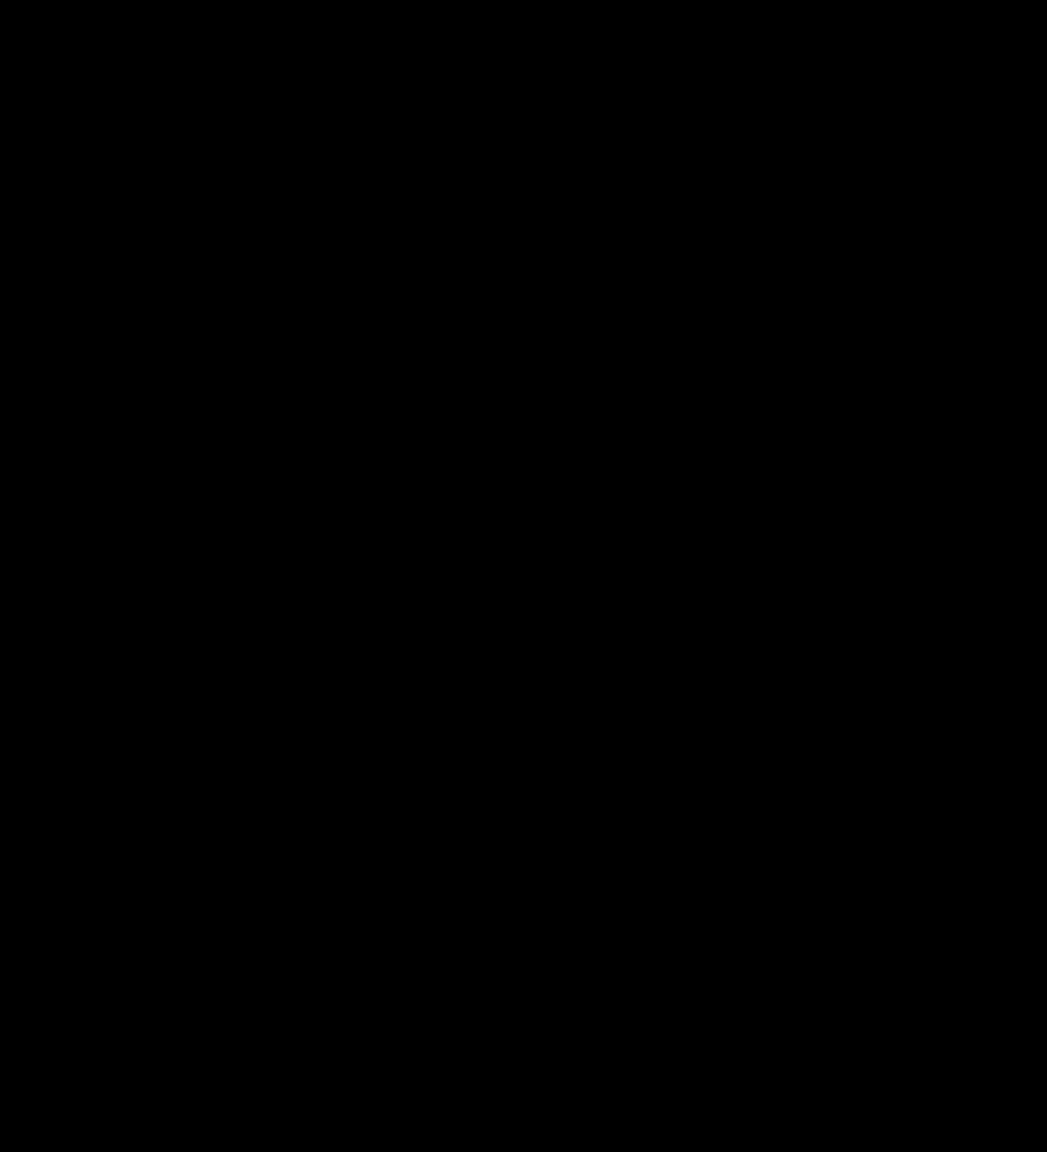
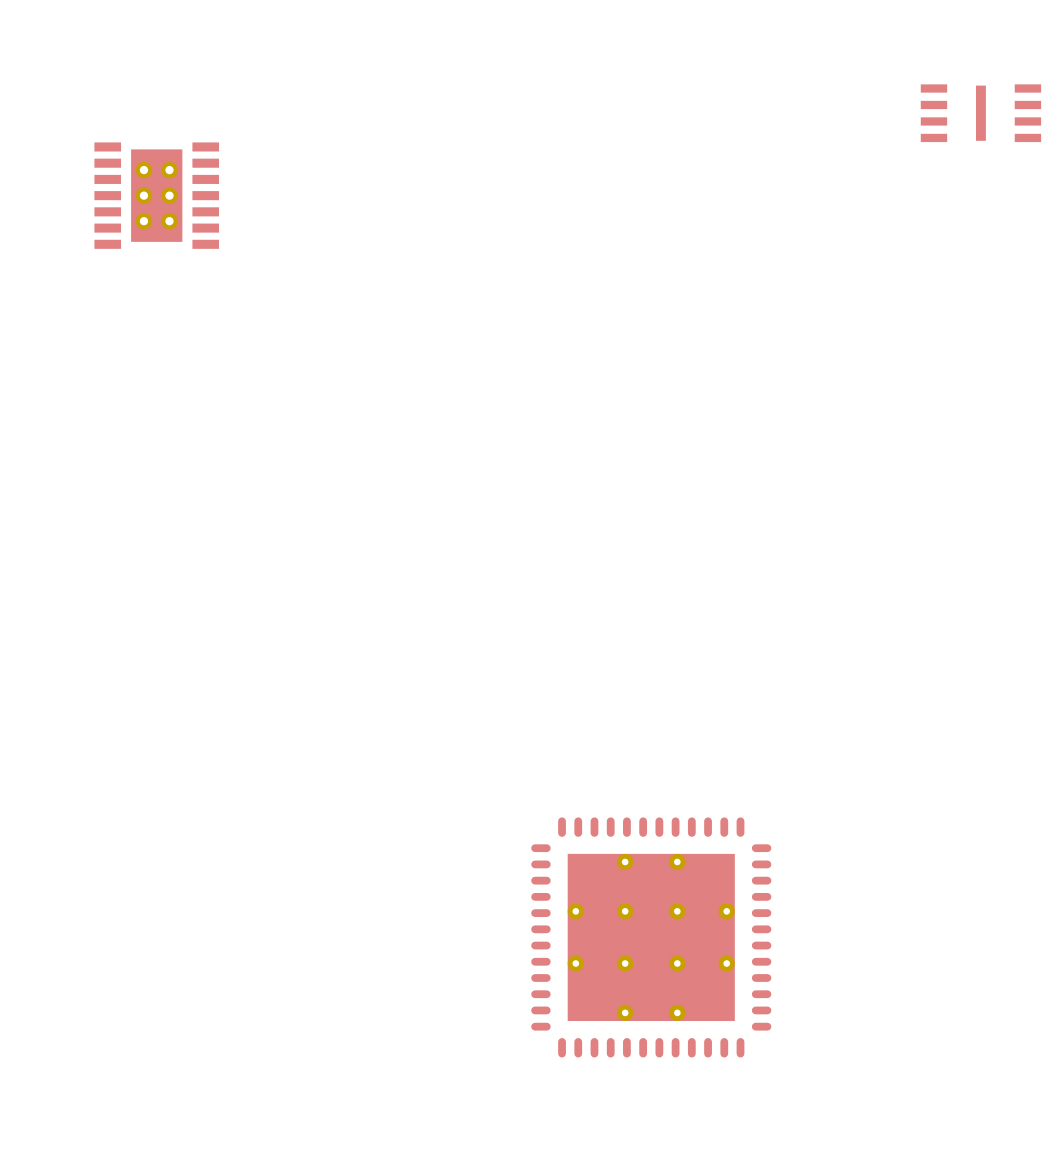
part: none -> (980, 113)
part: none -> (156, 195)
part: none -> (651, 937)

